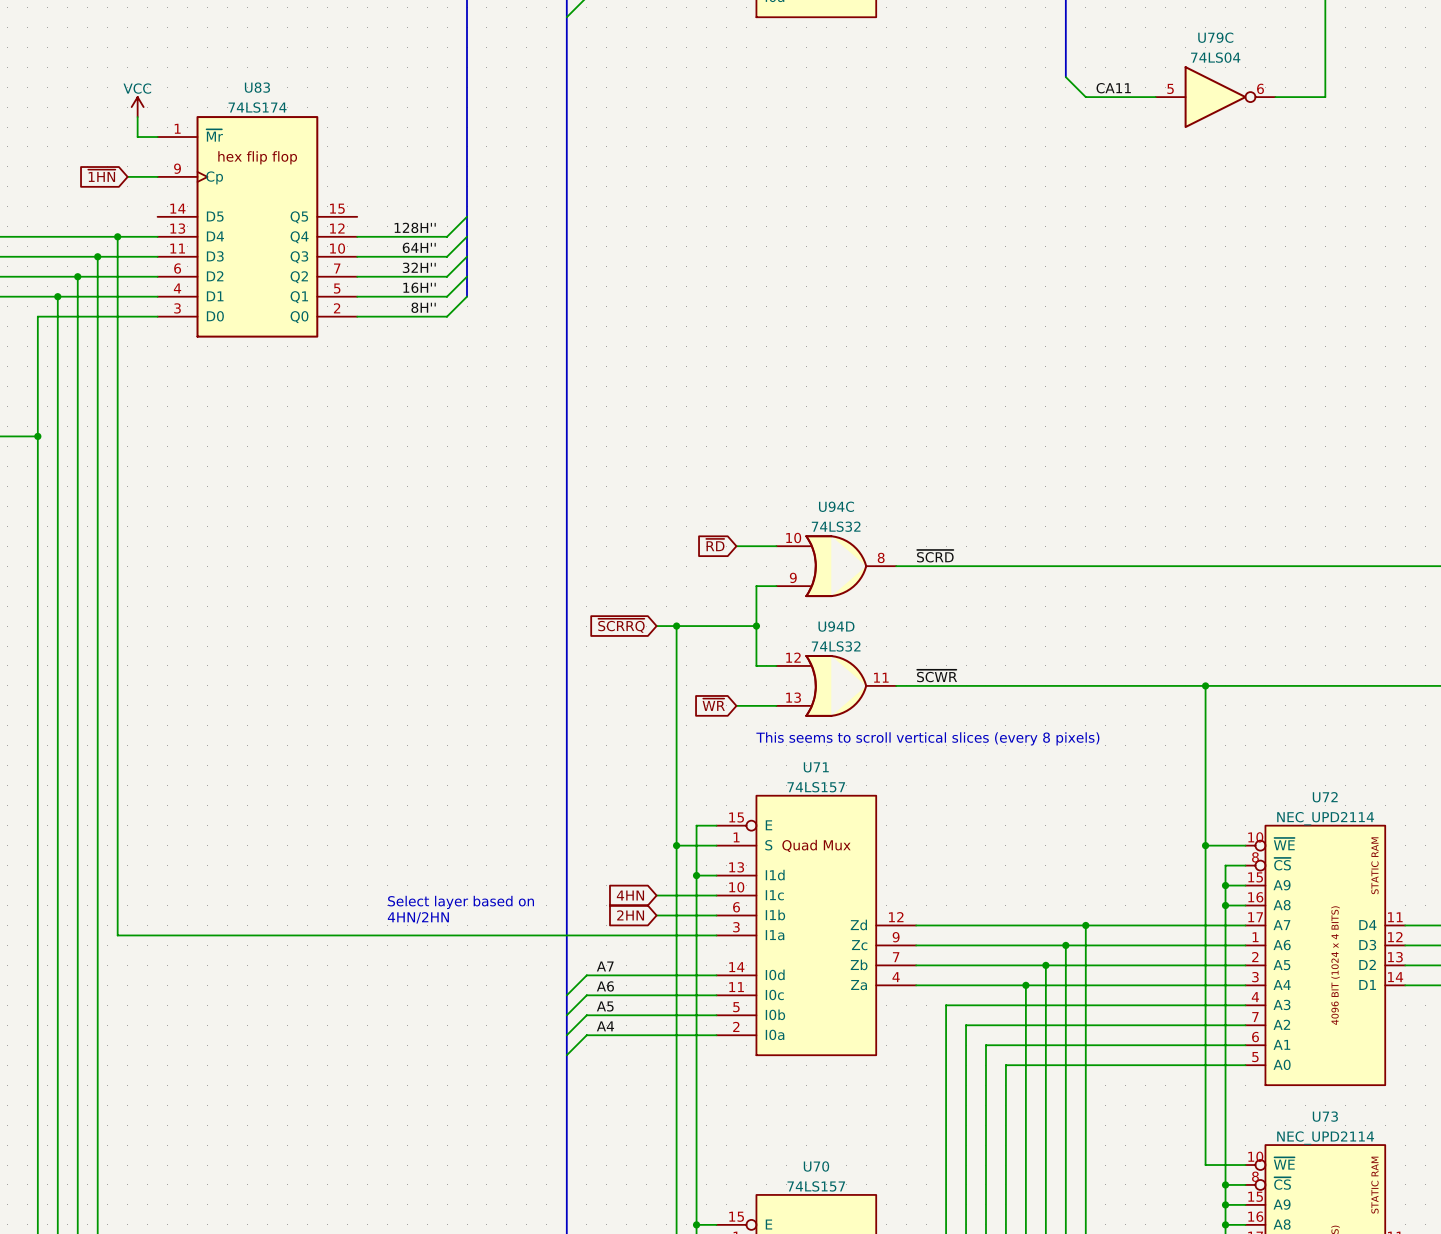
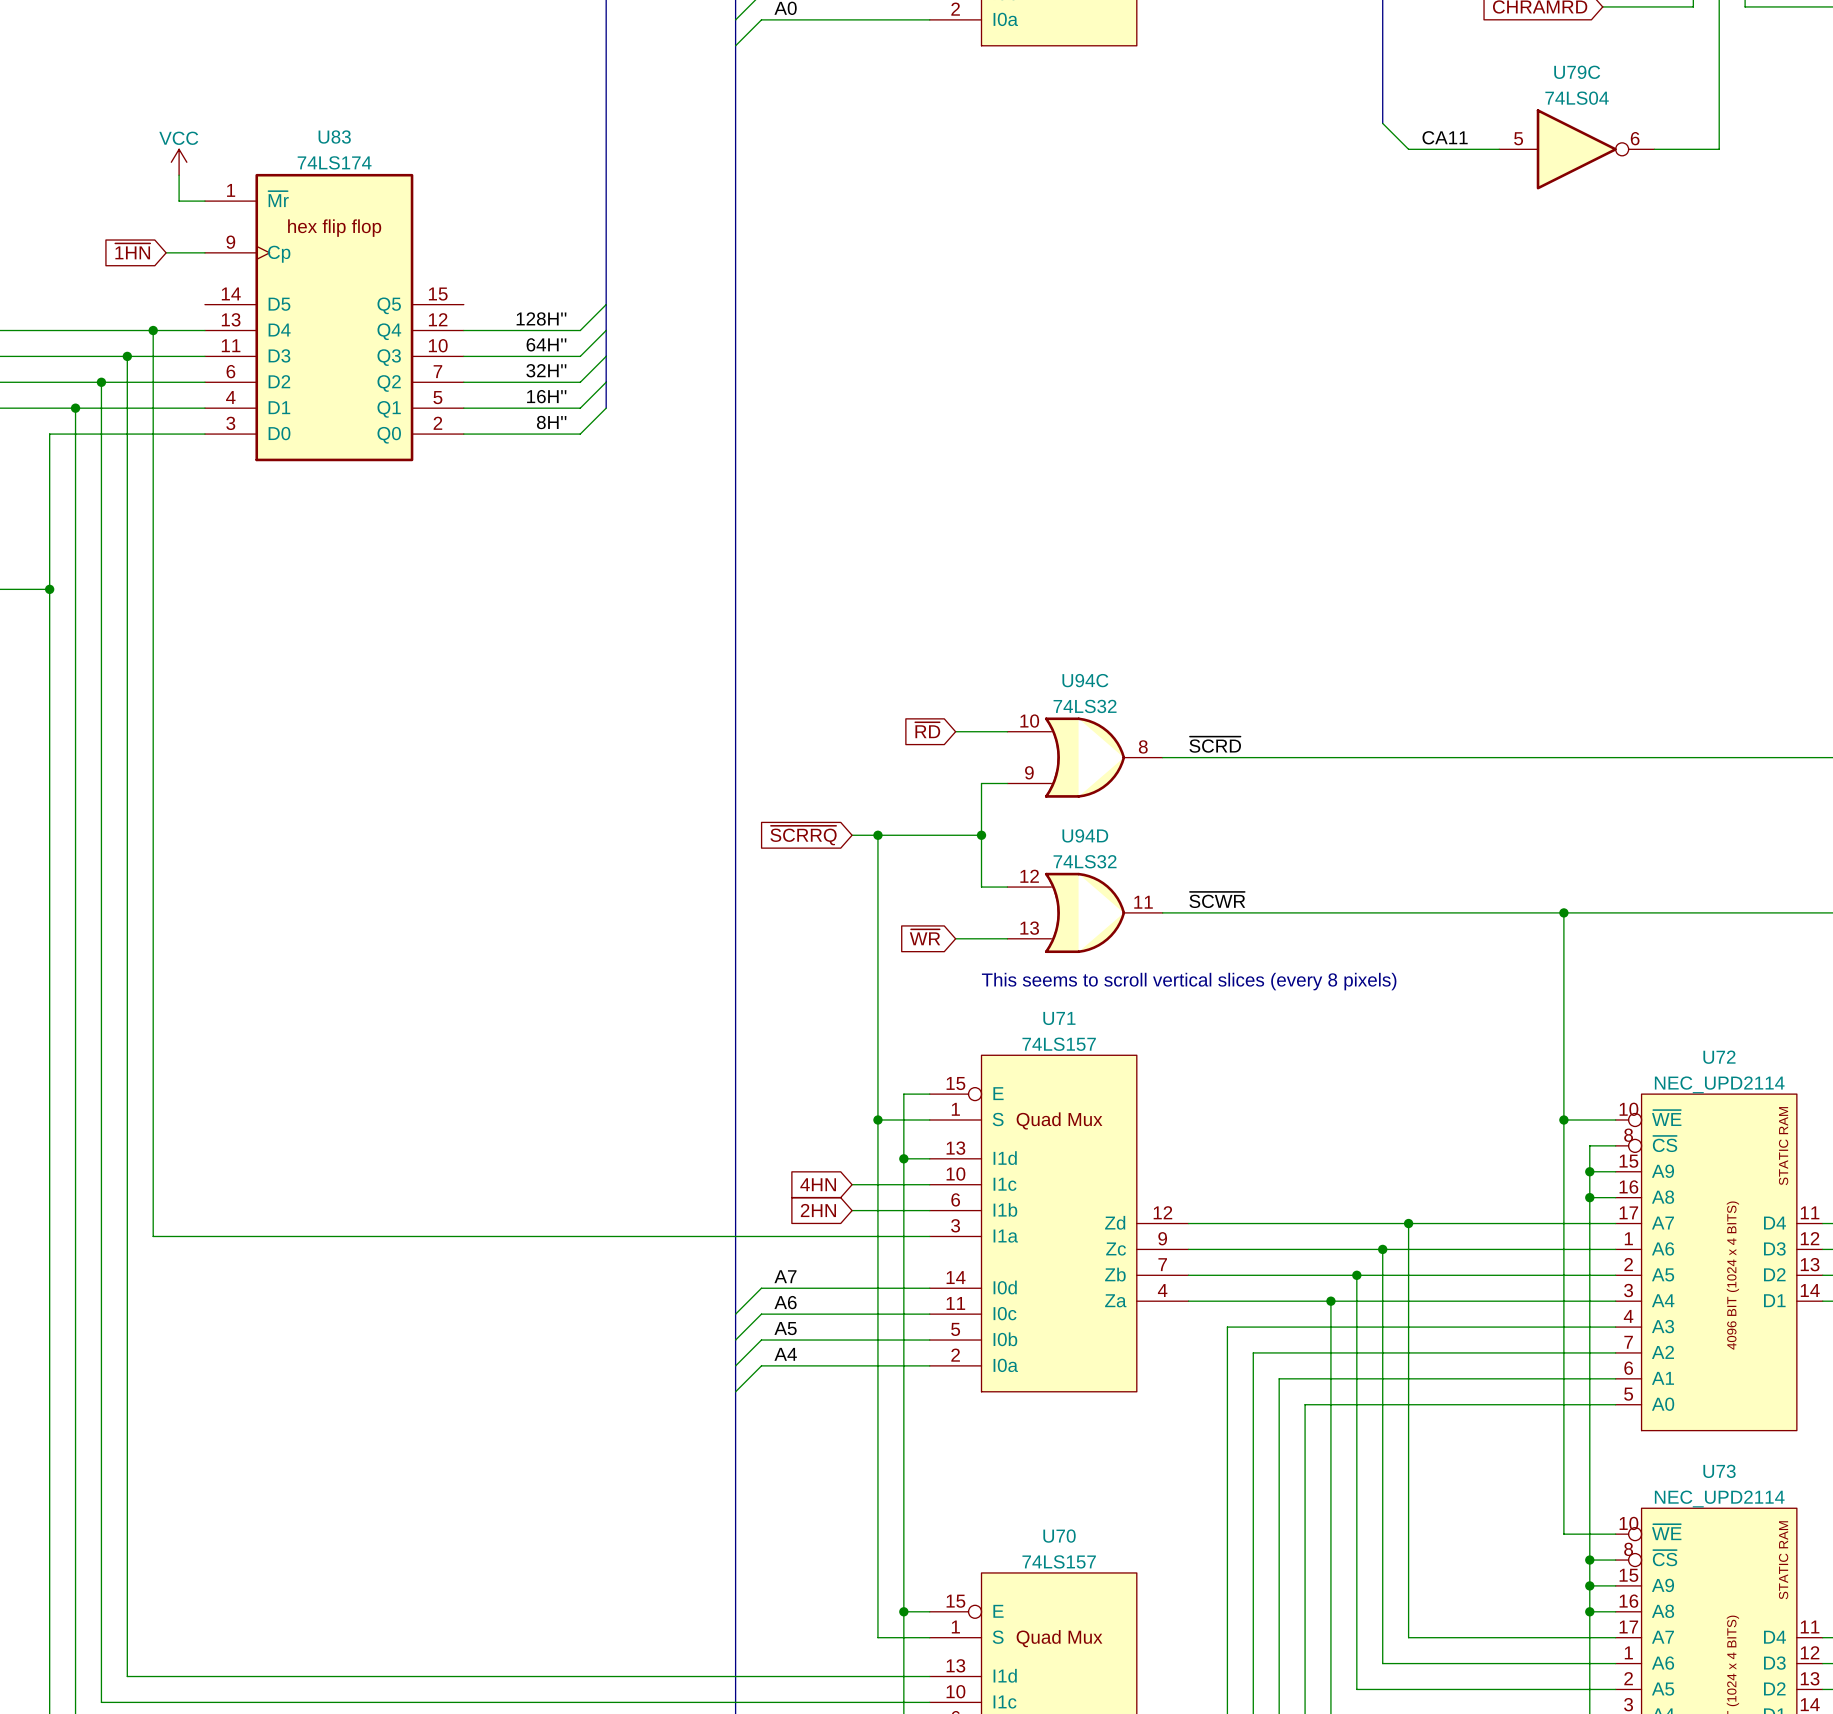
text: Select layer based on (461, 902) -> none
text: 4HN/2HN (418, 917) -> none

